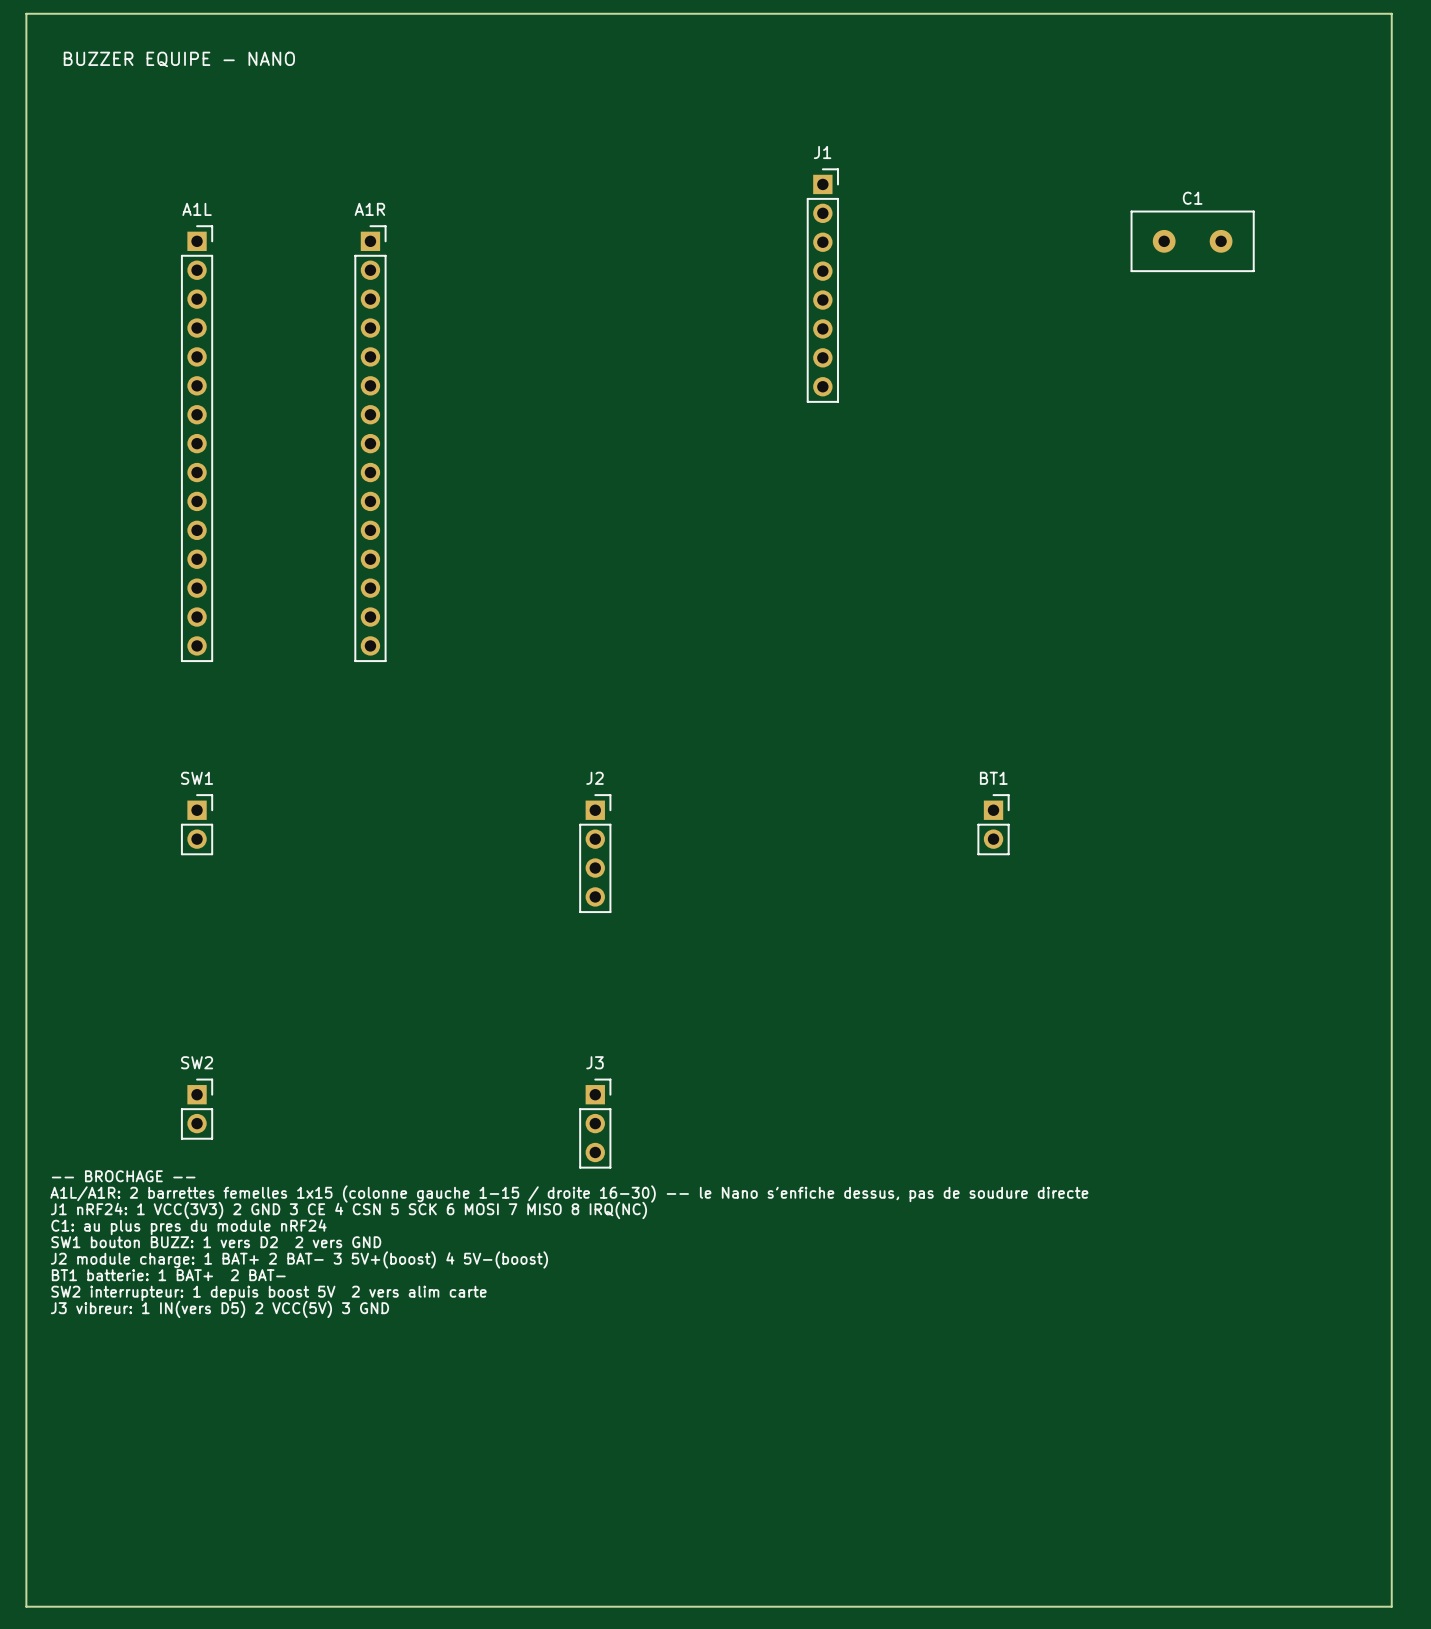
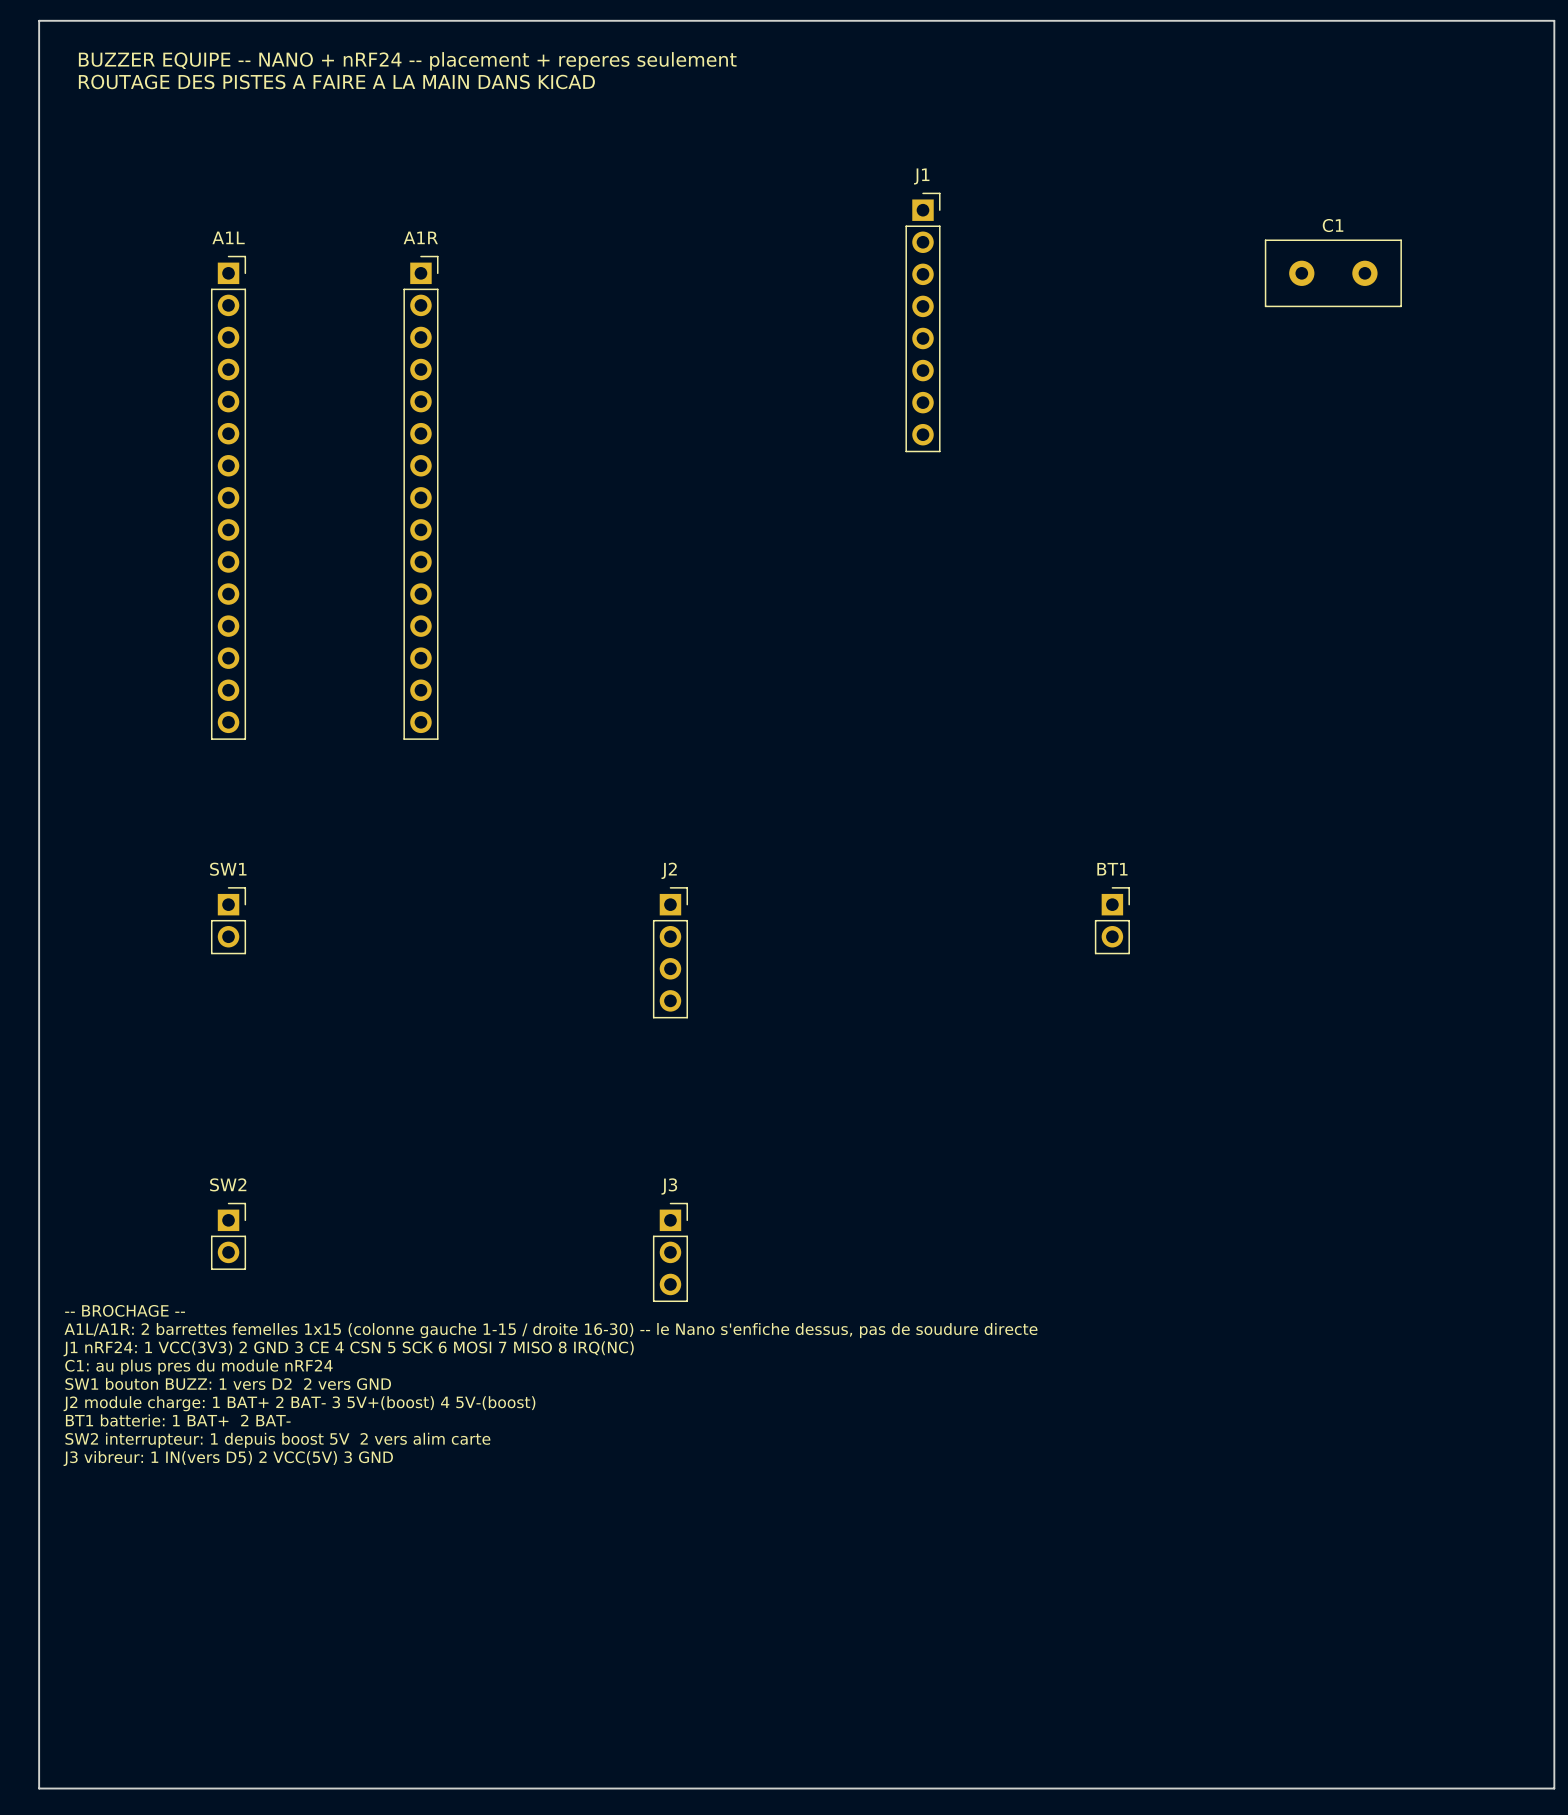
text: none -> BUZZER EQUIPE -- NANO + nRF24 -- placement + reperes seulement (407, 61)
text: BUZZER EQUIPE - NANO (179, 59) -> none
text: none -> ROUTAGE DES PISTES A FAIRE A LA MAIN DANS KICAD (336, 81)

